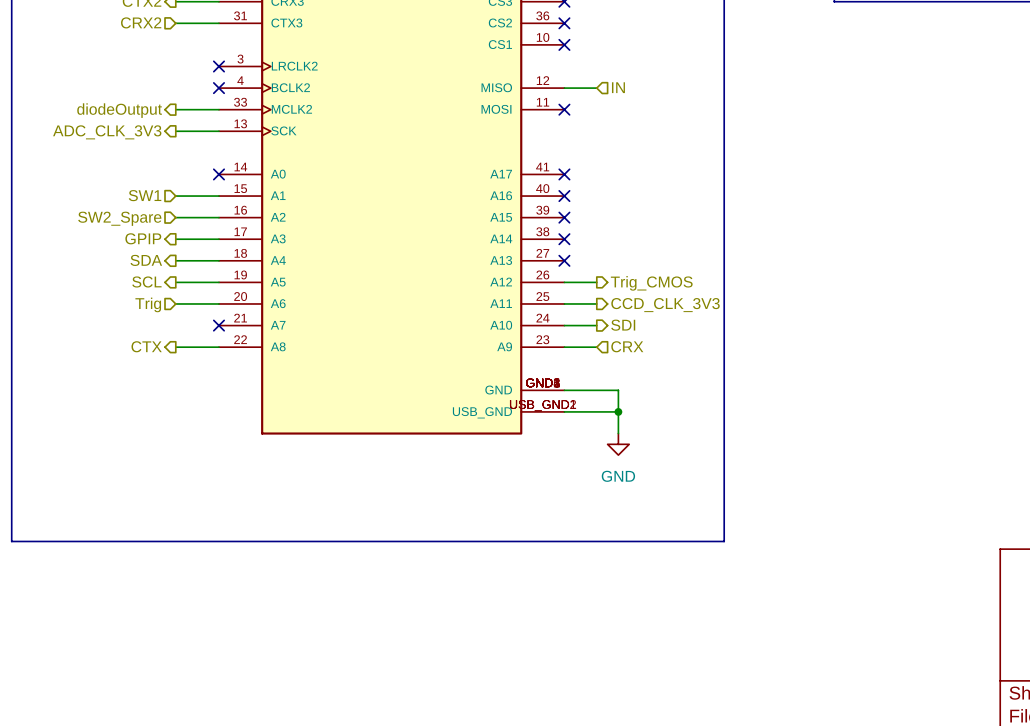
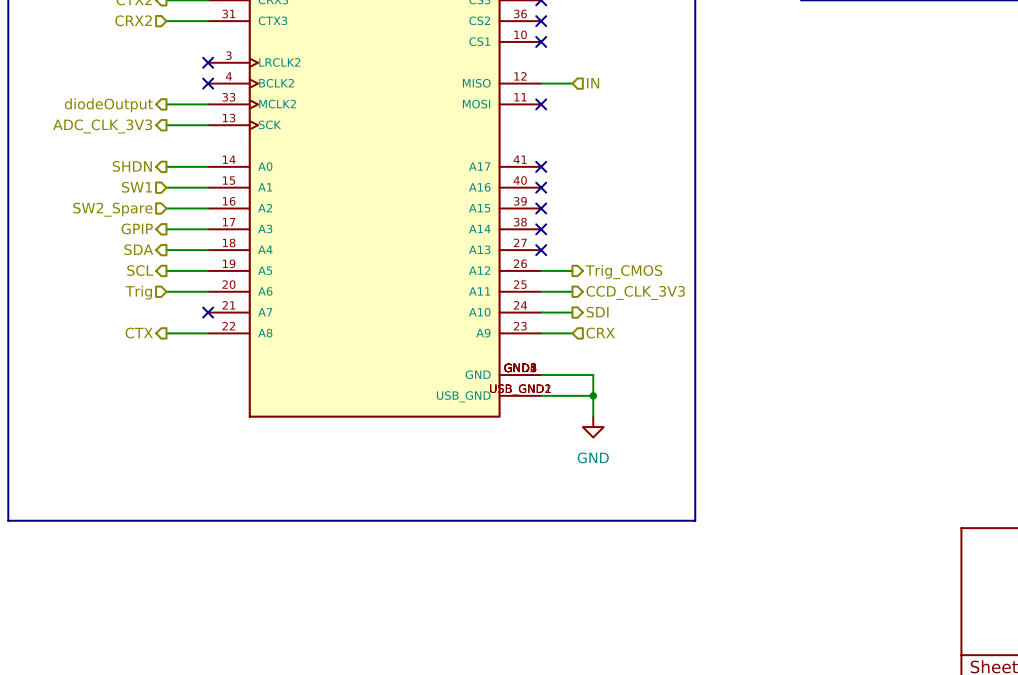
hierarchical label: none -> SHDN (132, 166)
wire: none -> (166, 166) (208, 166)
no-connect mark: (218, 174) -> none

